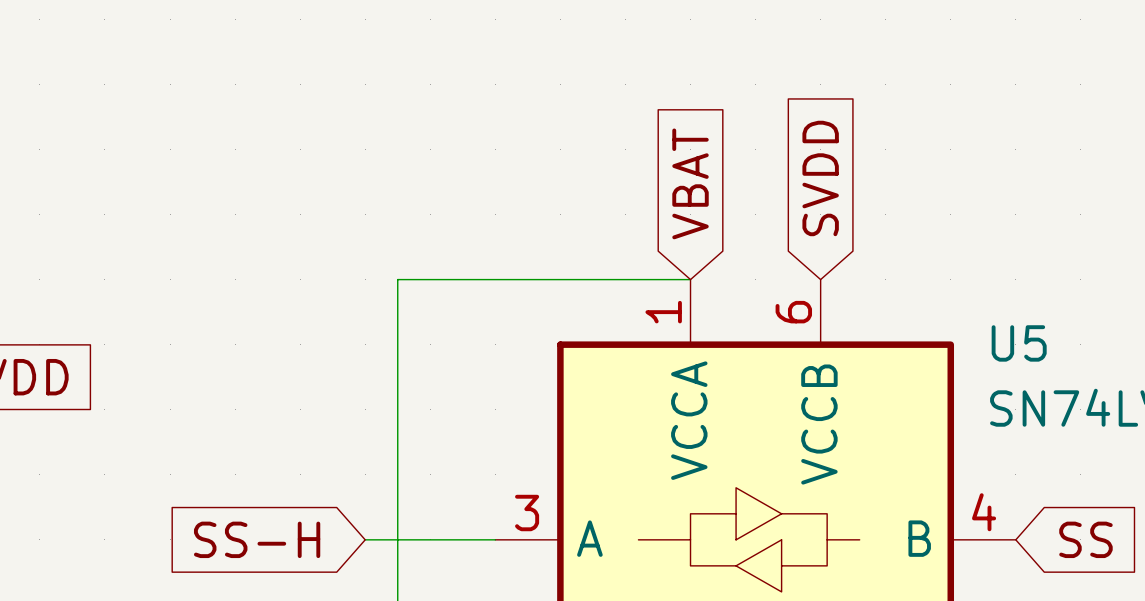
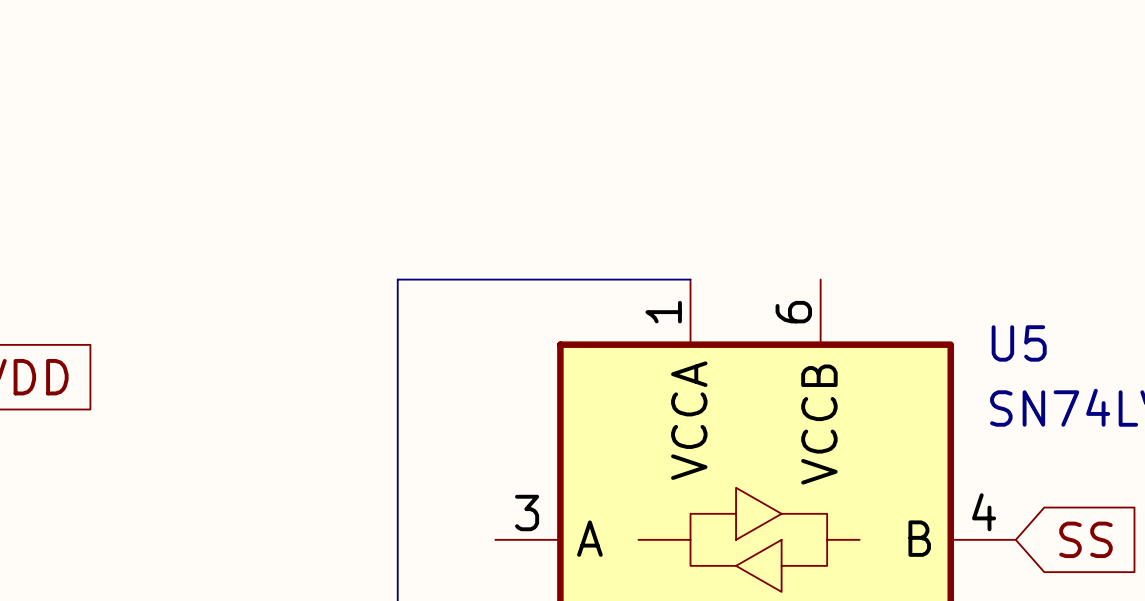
global label: SVDD (820, 178) -> none
global label: VBAT (690, 183) -> none
global label: SS-H (257, 539) -> none
wire: (365, 539) (495, 539) -> none

